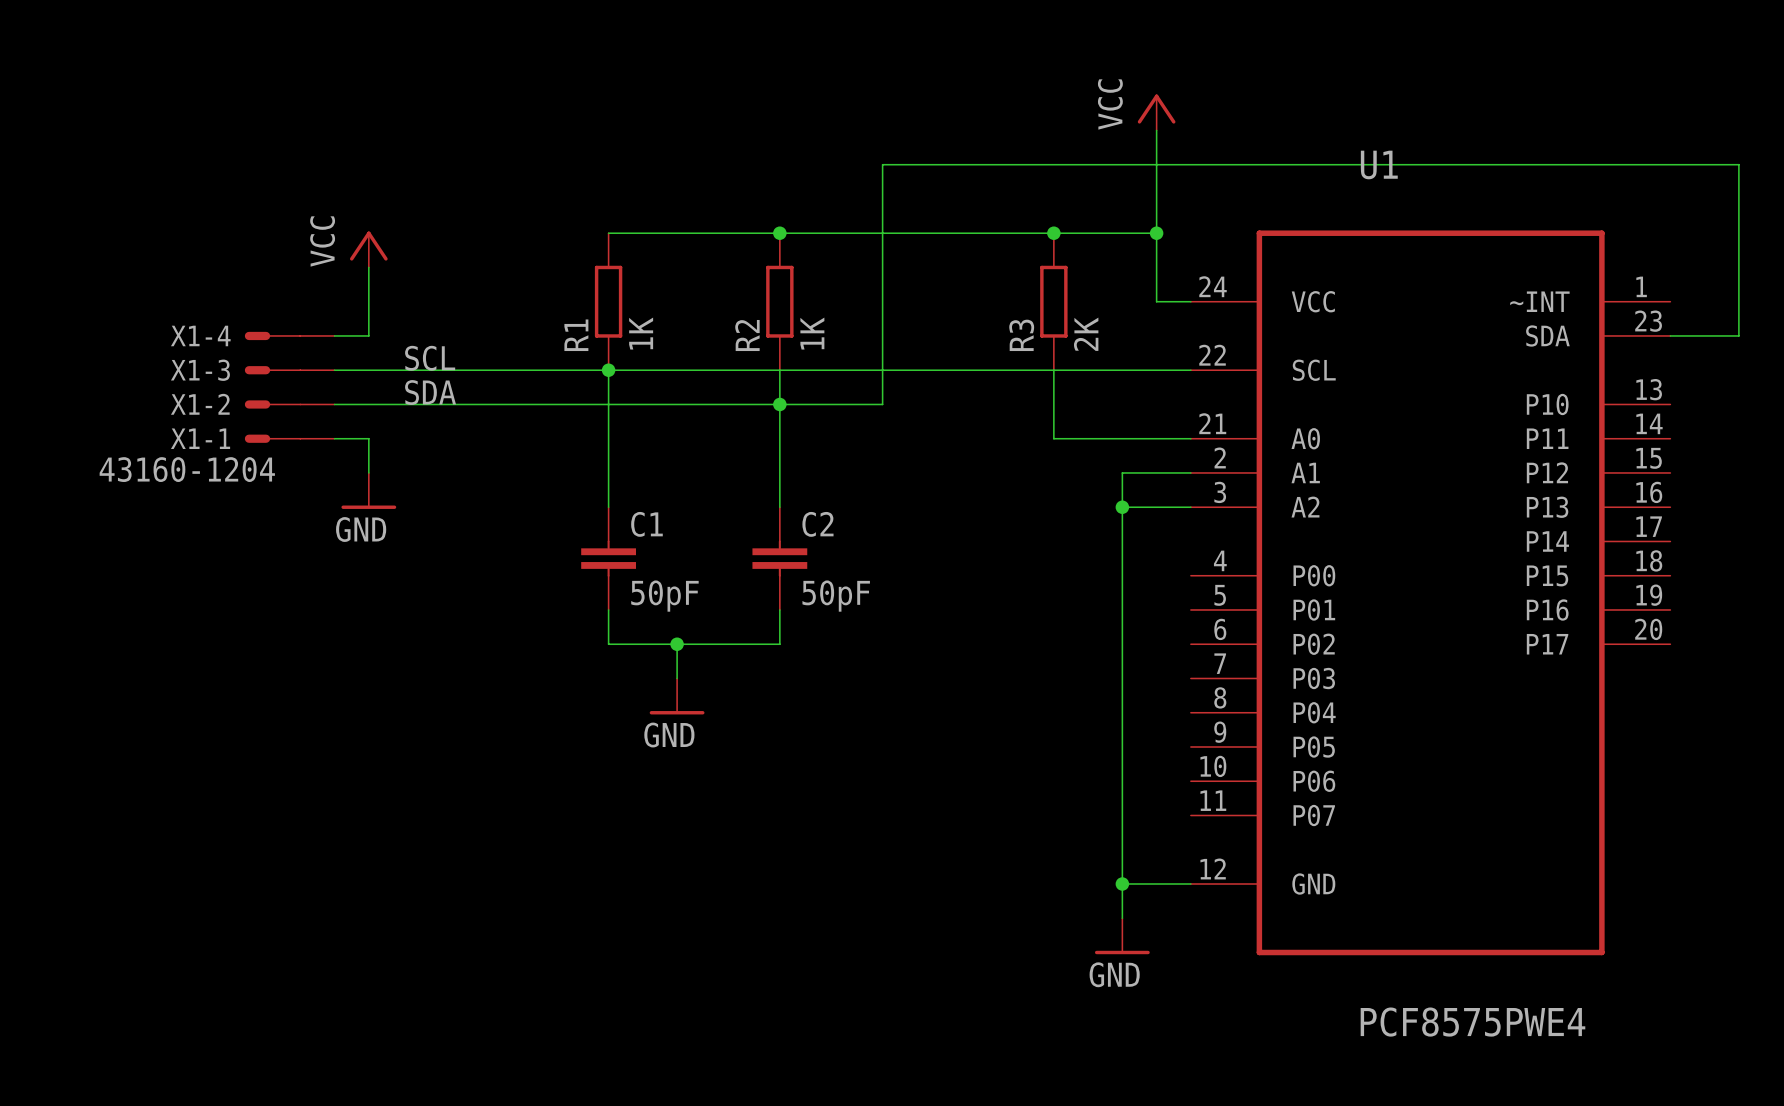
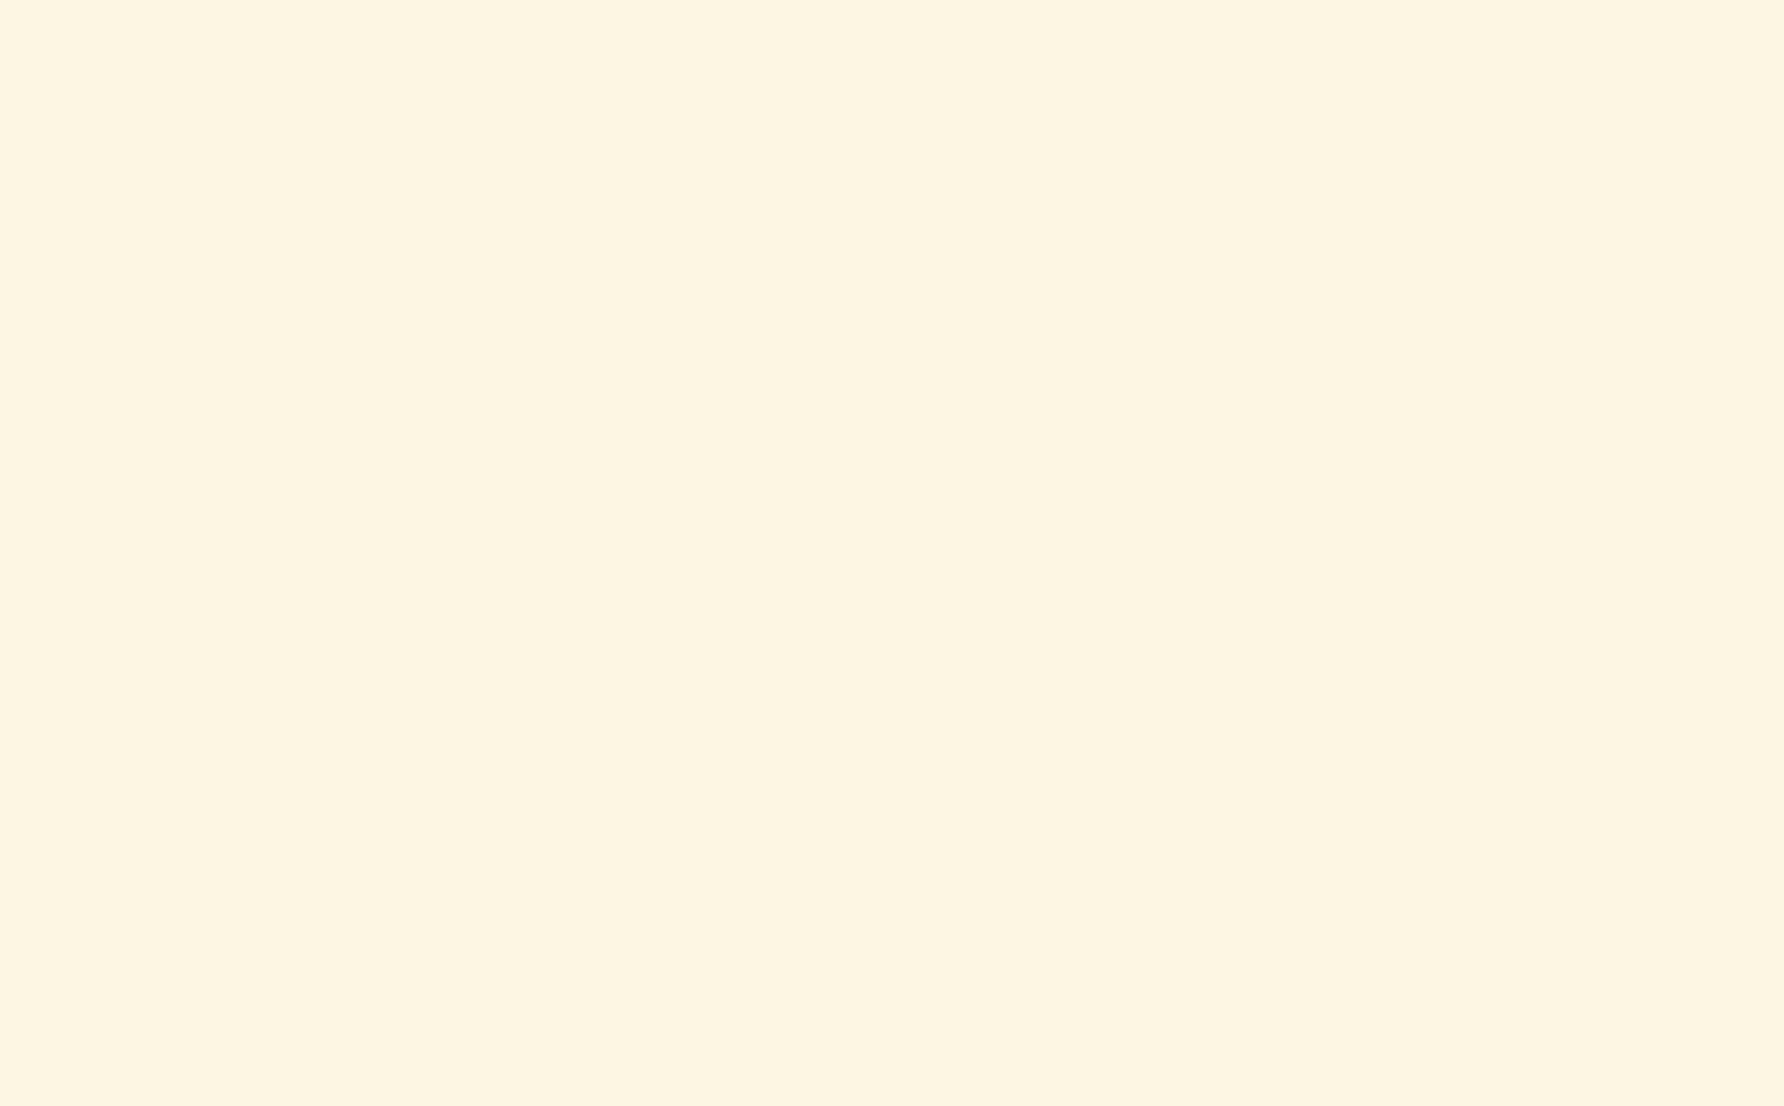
power symbol: VCC (1156, 112) -> none
wire: (1156, 130) (1156, 301) (1190, 301) -> none
wire: (608, 233) (1156, 233) -> none
junction: (779, 233) -> none
junction: (1053, 233) -> none
junction: (1156, 233) -> none
power symbol: VCC (368, 249) -> none
wire: (368, 267) (368, 335) (334, 335) -> none
R1: 1K (608, 301) -> none
R2: 1K (779, 301) -> none
R3: 2K (1053, 301) -> none
X1-4: (289, 335) -> none
wire: (1670, 335) (1738, 335) (1738, 164) (882, 164) (882, 404) (334, 404) -> none
label: SCL (430, 358) -> none
X1-3: (289, 370) -> none
wire: (334, 370) (1190, 370) -> none
wire: (608, 370) (608, 507) -> none
junction: (608, 370) -> none
wire: (779, 370) (779, 507) -> none
wire: (1053, 370) (1053, 438) (1190, 438) -> none
label: SDA (430, 392) -> none
X1-2: (289, 404) -> none
junction: (779, 404) -> none
X1-1: 43160-1204 (289, 438) -> none
wire: (334, 438) (368, 438) (368, 472) -> none
wire: (1190, 472) (1122, 472) (1122, 918) -> none
power symbol: GND (368, 490) -> none
wire: (1122, 507) (1190, 507) -> none
junction: (1122, 507) -> none
C1: 50pF (608, 558) -> none
C2: 50pF (779, 558) -> none
U1: PCF8575PWE4 (1430, 592) -> none
wire: (608, 609) (608, 644) (779, 644) (779, 609) -> none
wire: (677, 644) (677, 678) -> none
junction: (677, 644) -> none
power symbol: GND (677, 696) -> none
wire: (1122, 884) (1190, 884) -> none
junction: (1122, 884) -> none
power symbol: GND (1122, 936) -> none

